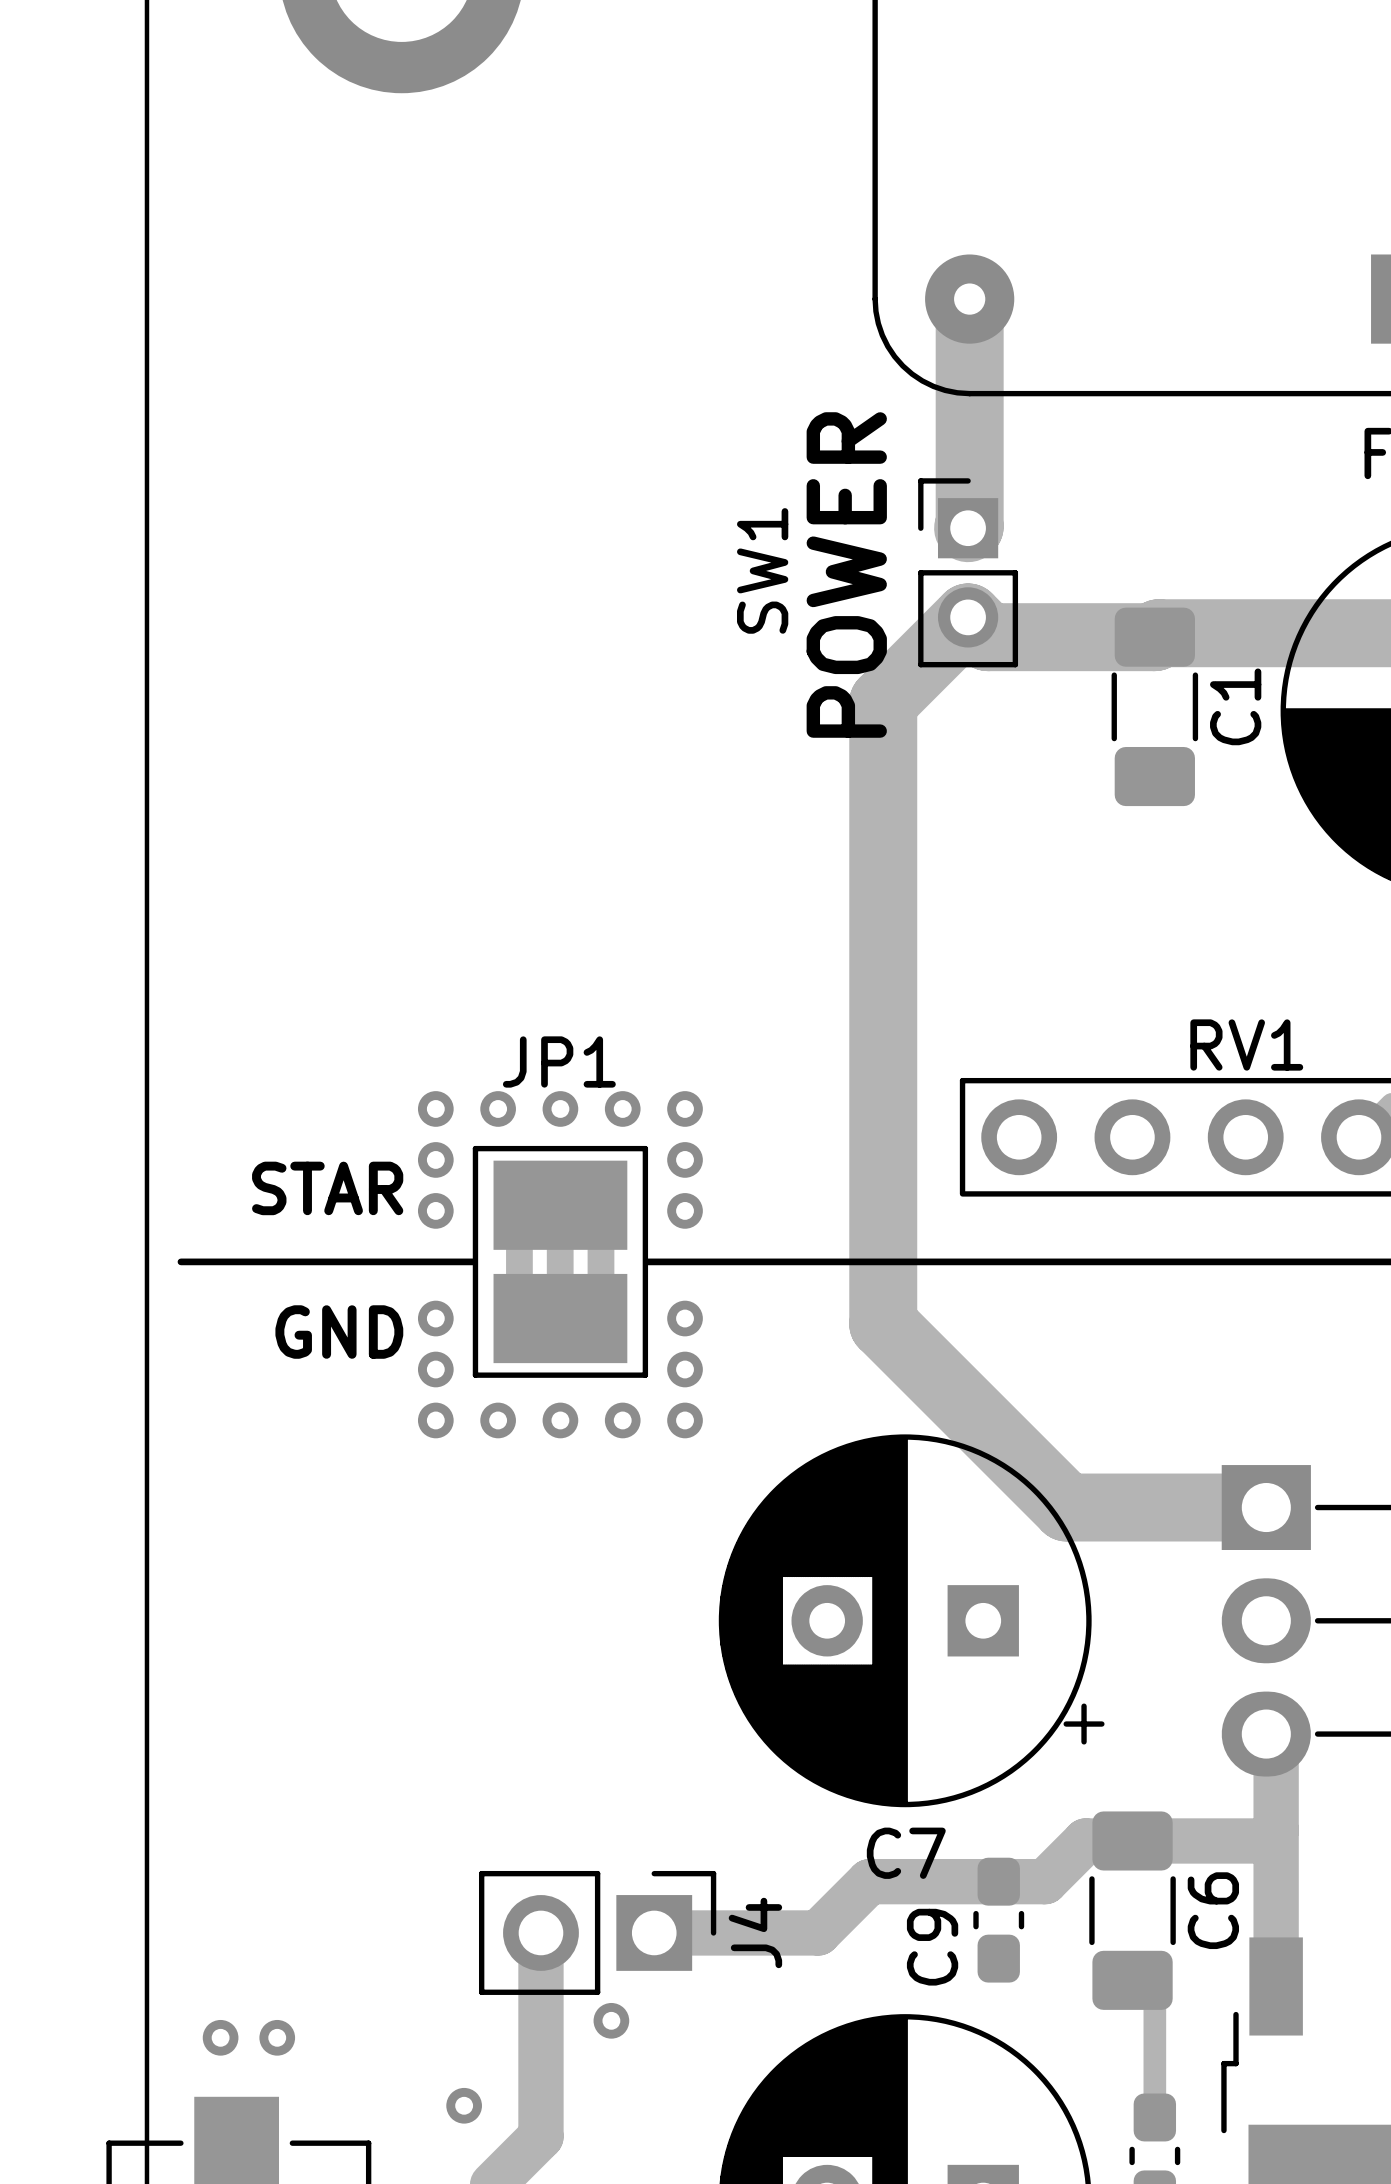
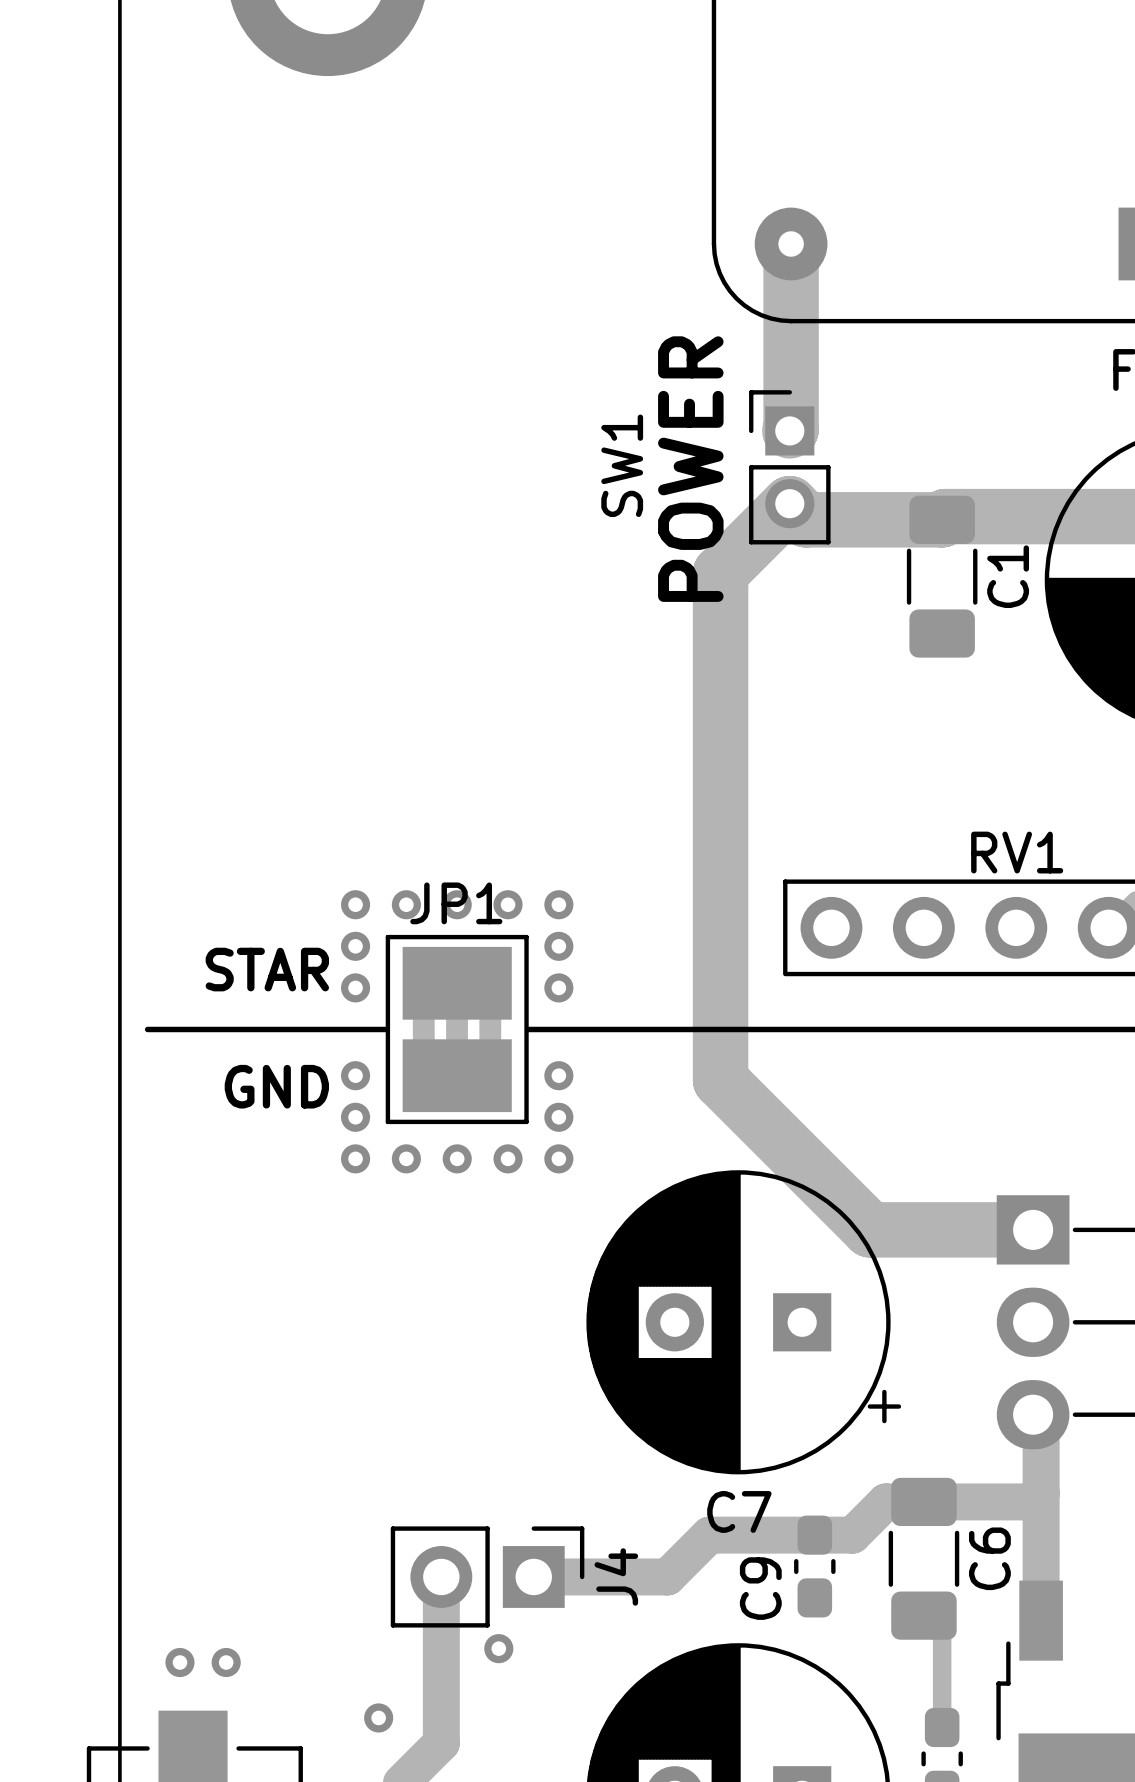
JP1 name position: JP1 (559, 1061) -> JP1 (456, 903)

